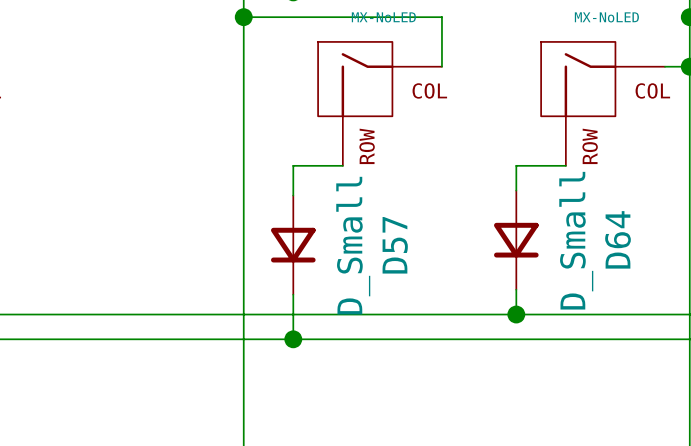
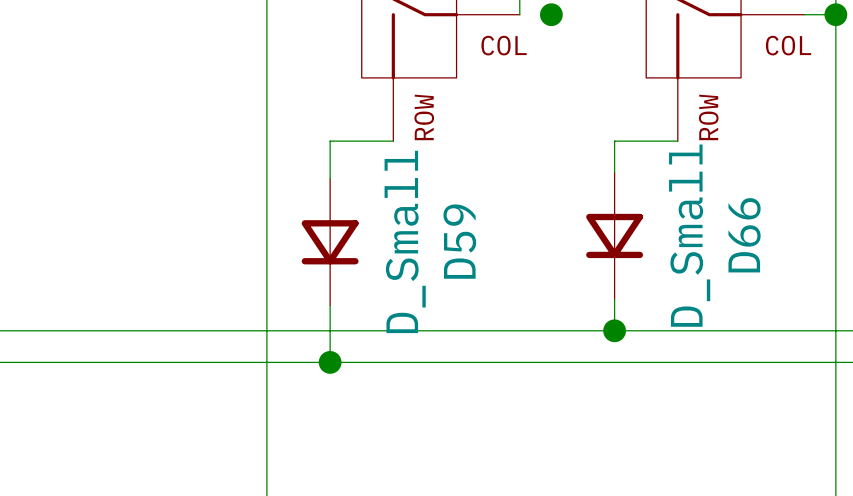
junction: none -> (551, 14)
D64 name: D64 (618, 239) -> D66 (744, 235)
D57 name: D57 (395, 245) -> D59 (459, 241)

